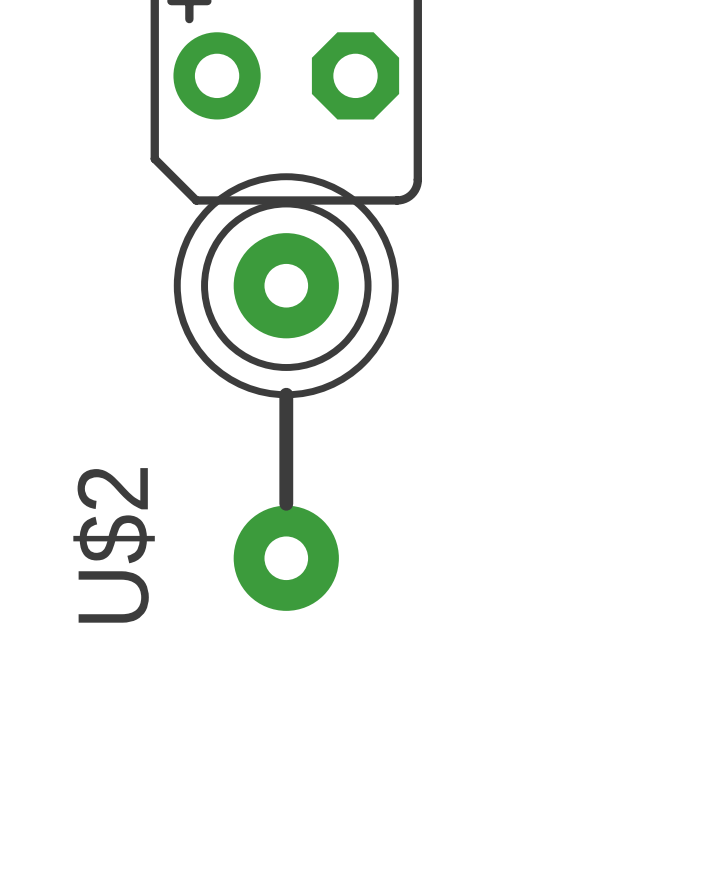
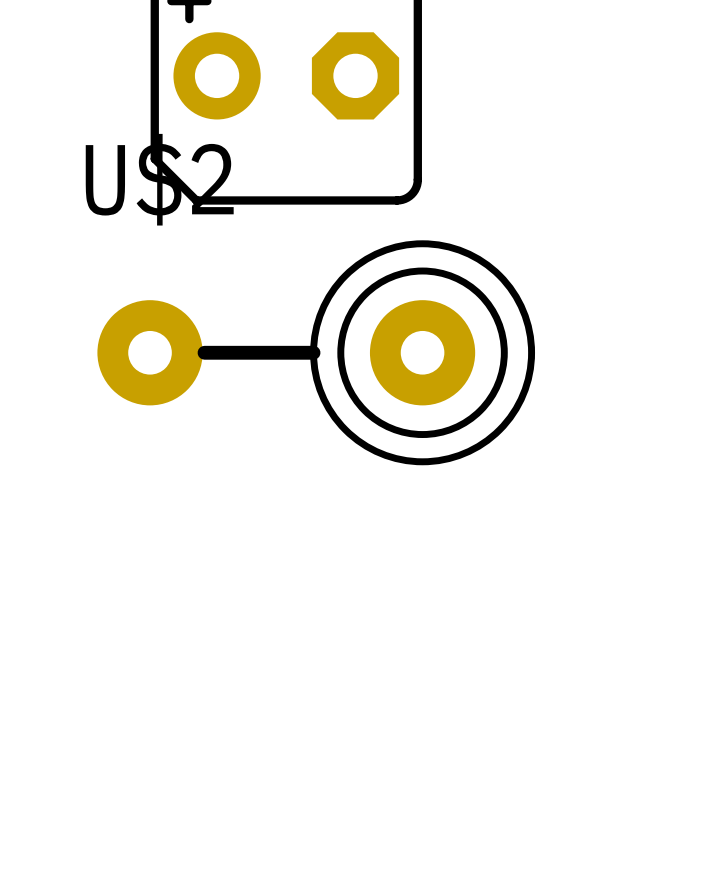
U$2 rotation: 0° (286, 392) -> 90° clockwise (316, 352)

